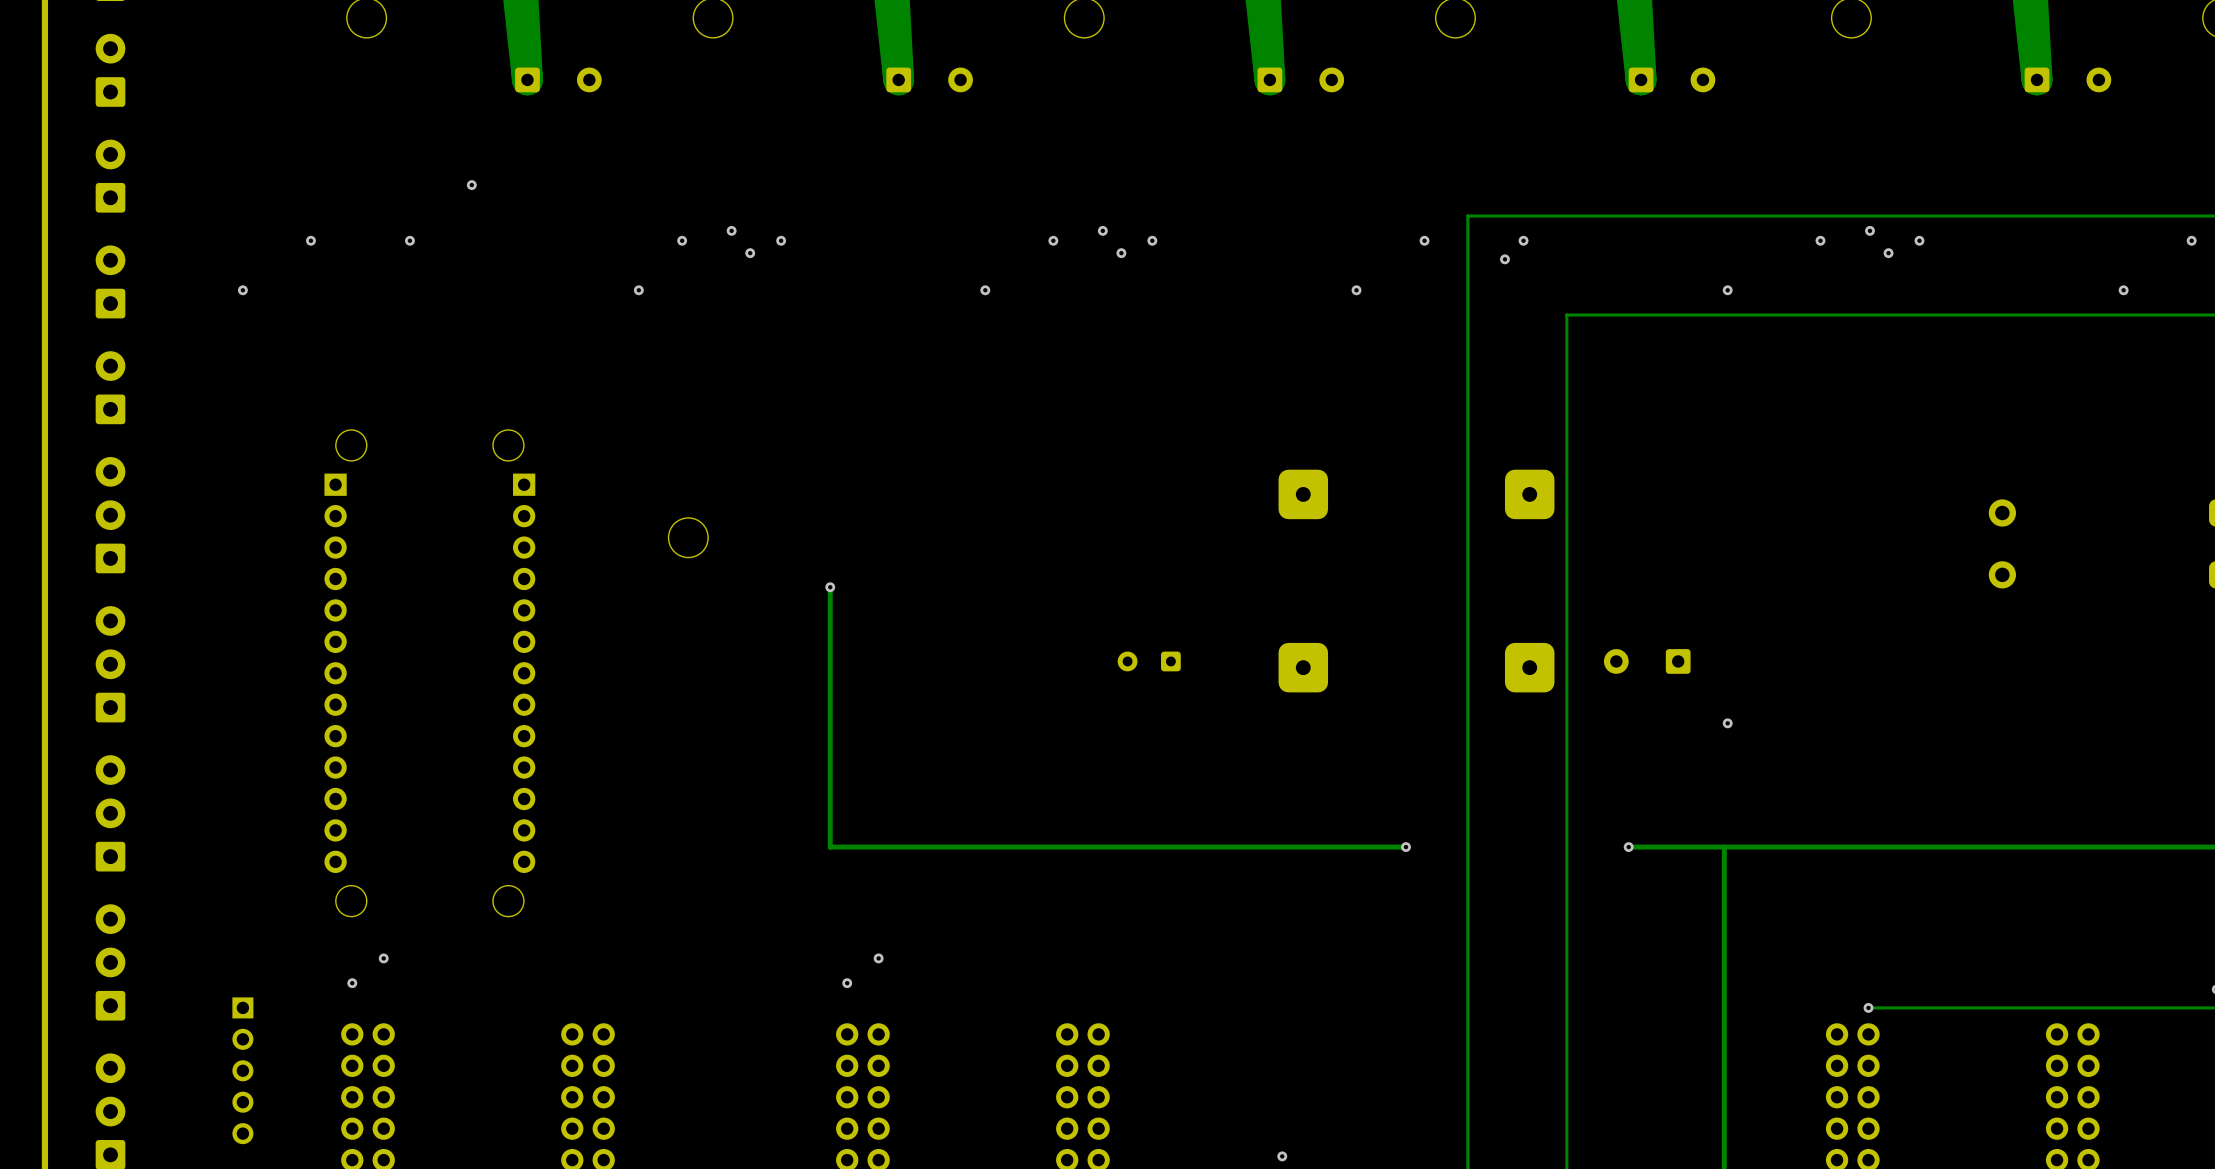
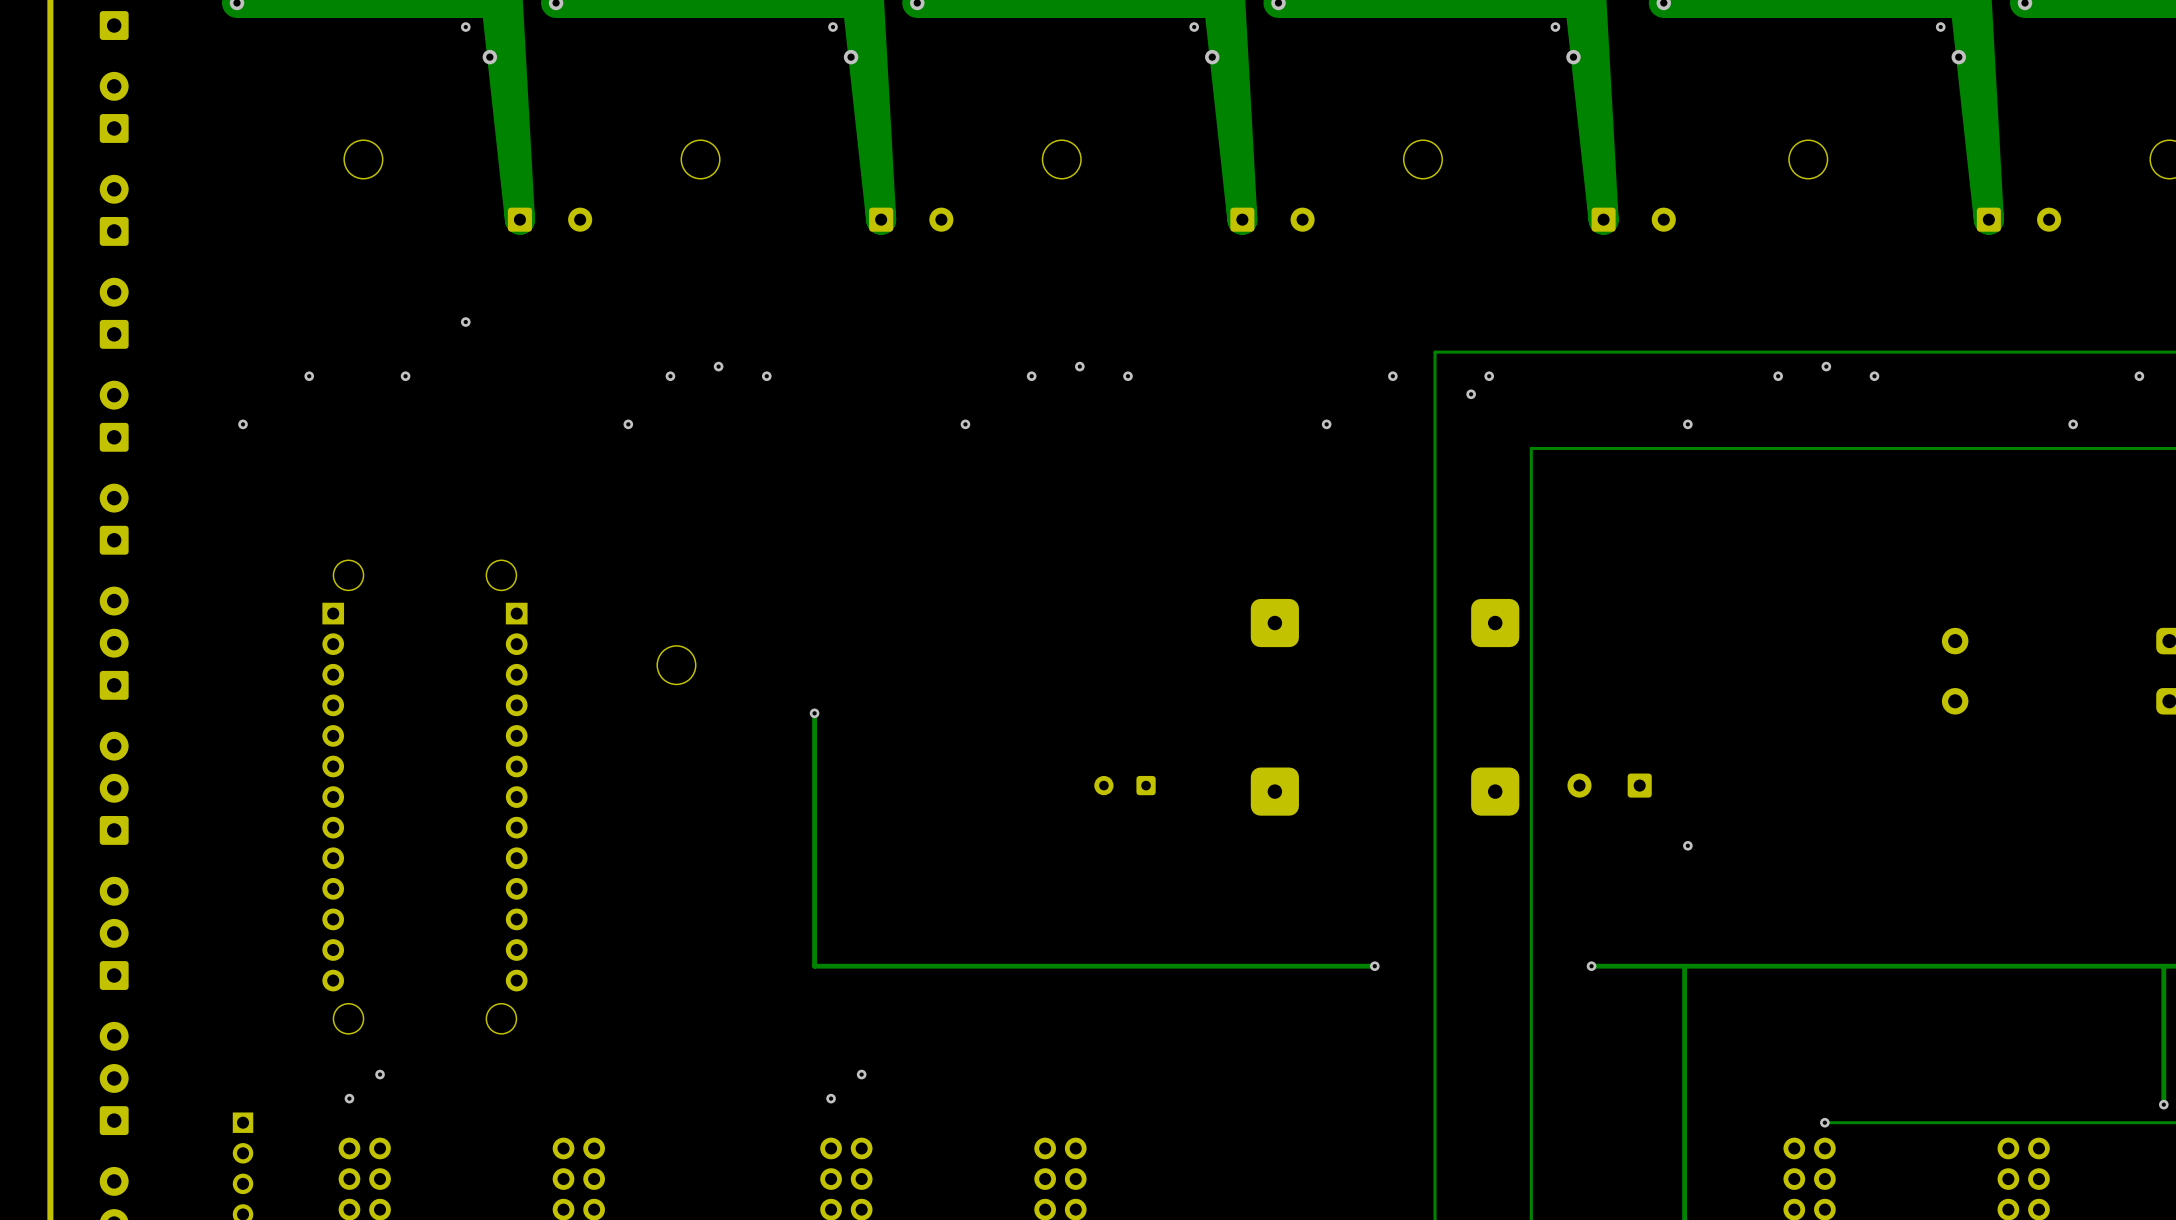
via: (750, 253) -> none
via: (1121, 253) -> none
via: (1888, 253) -> none

